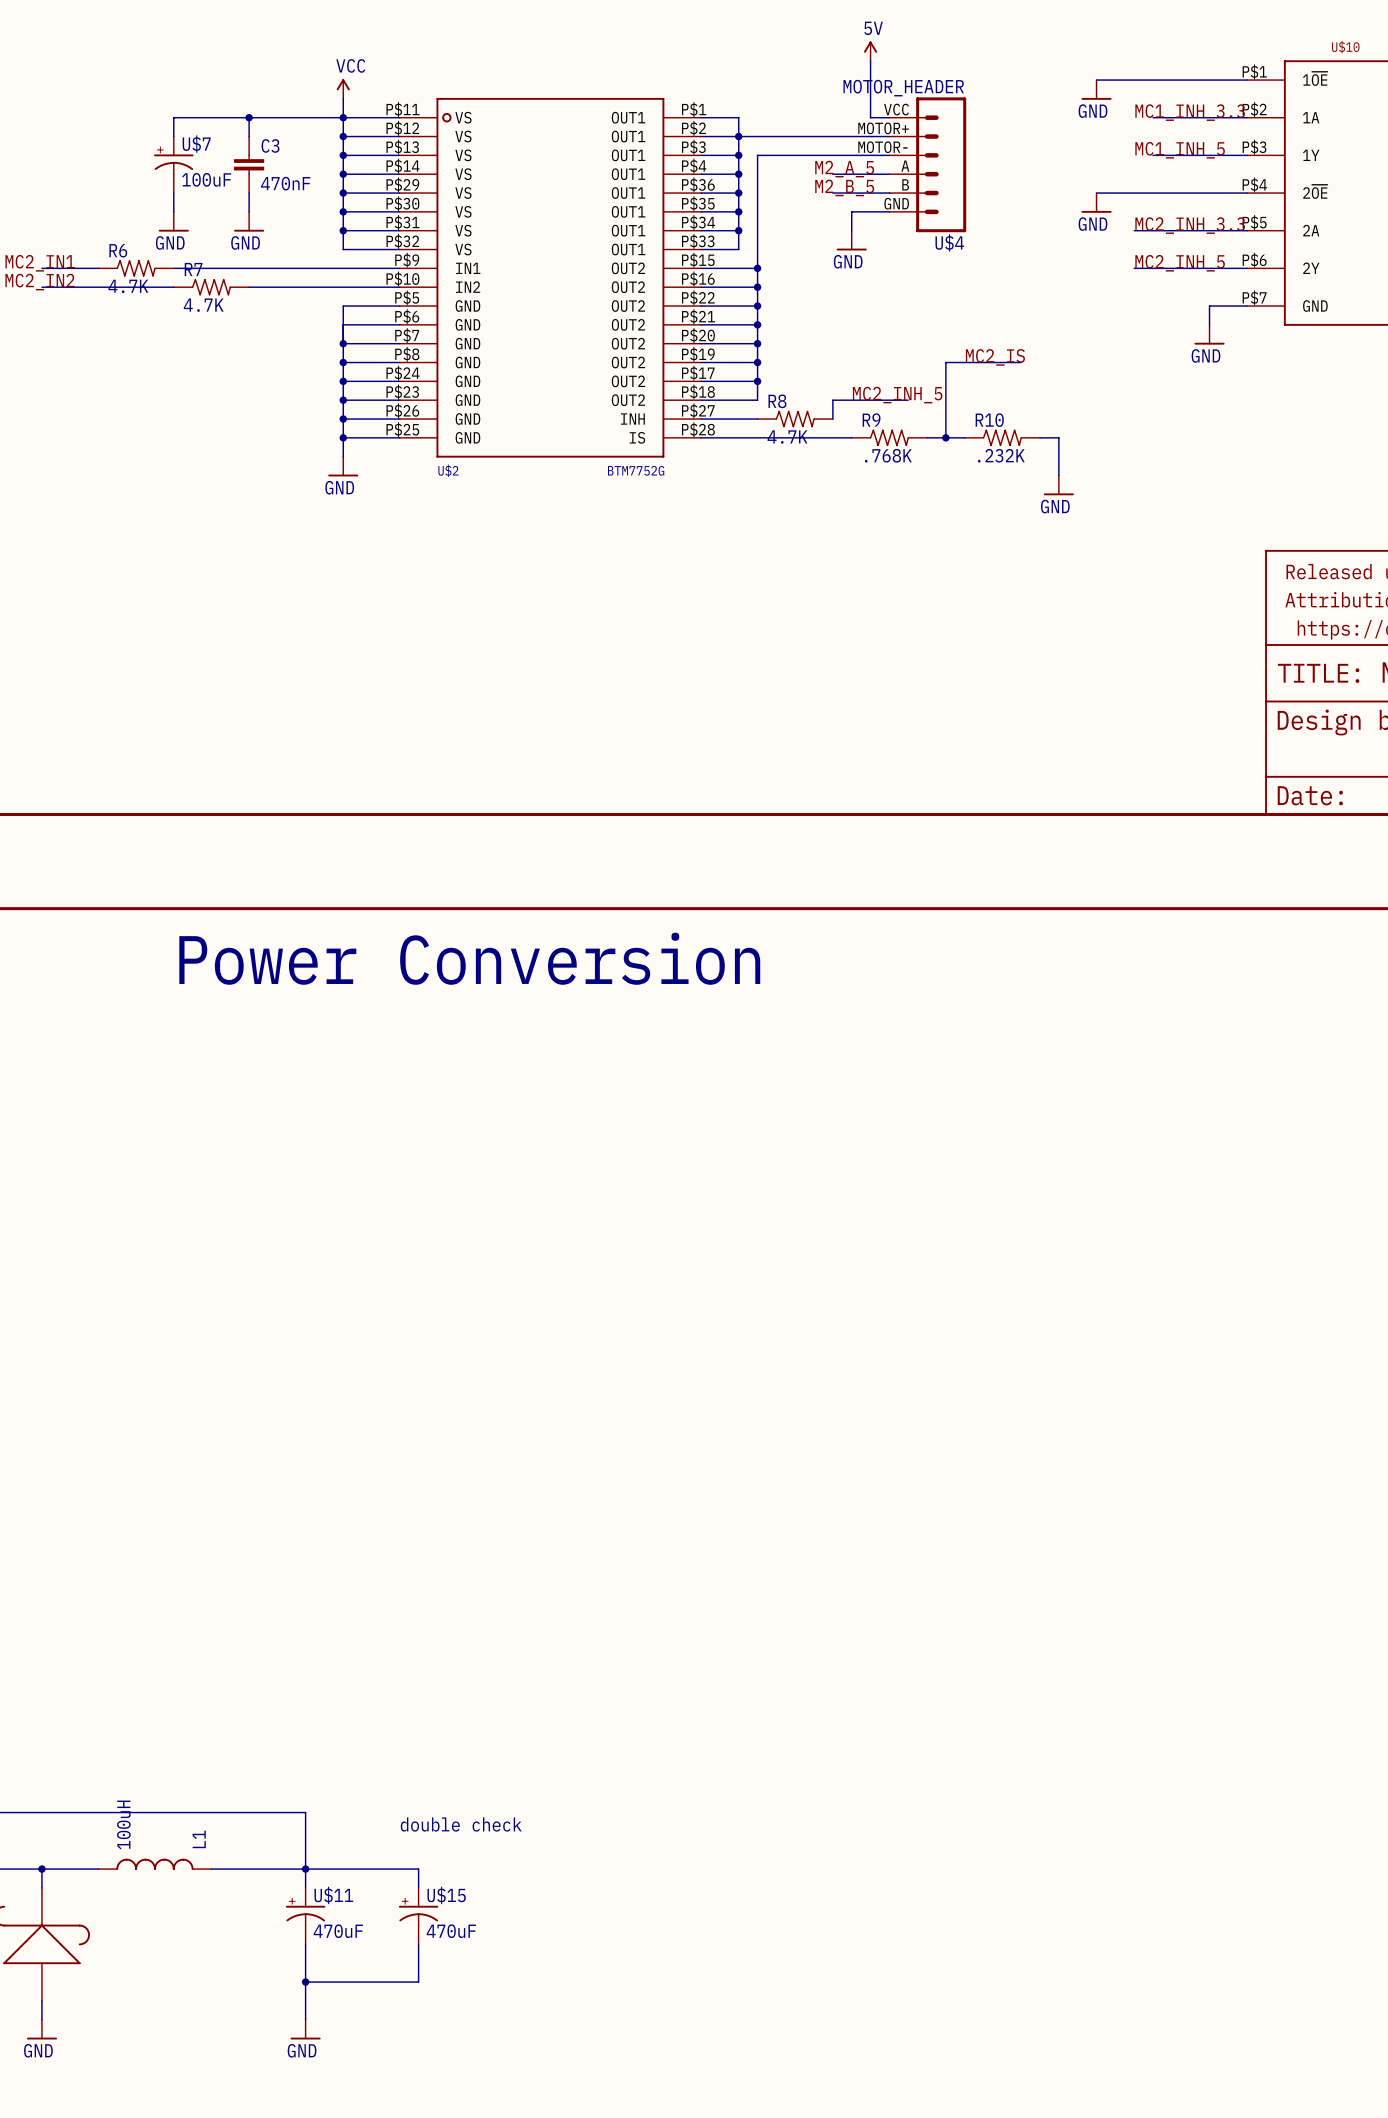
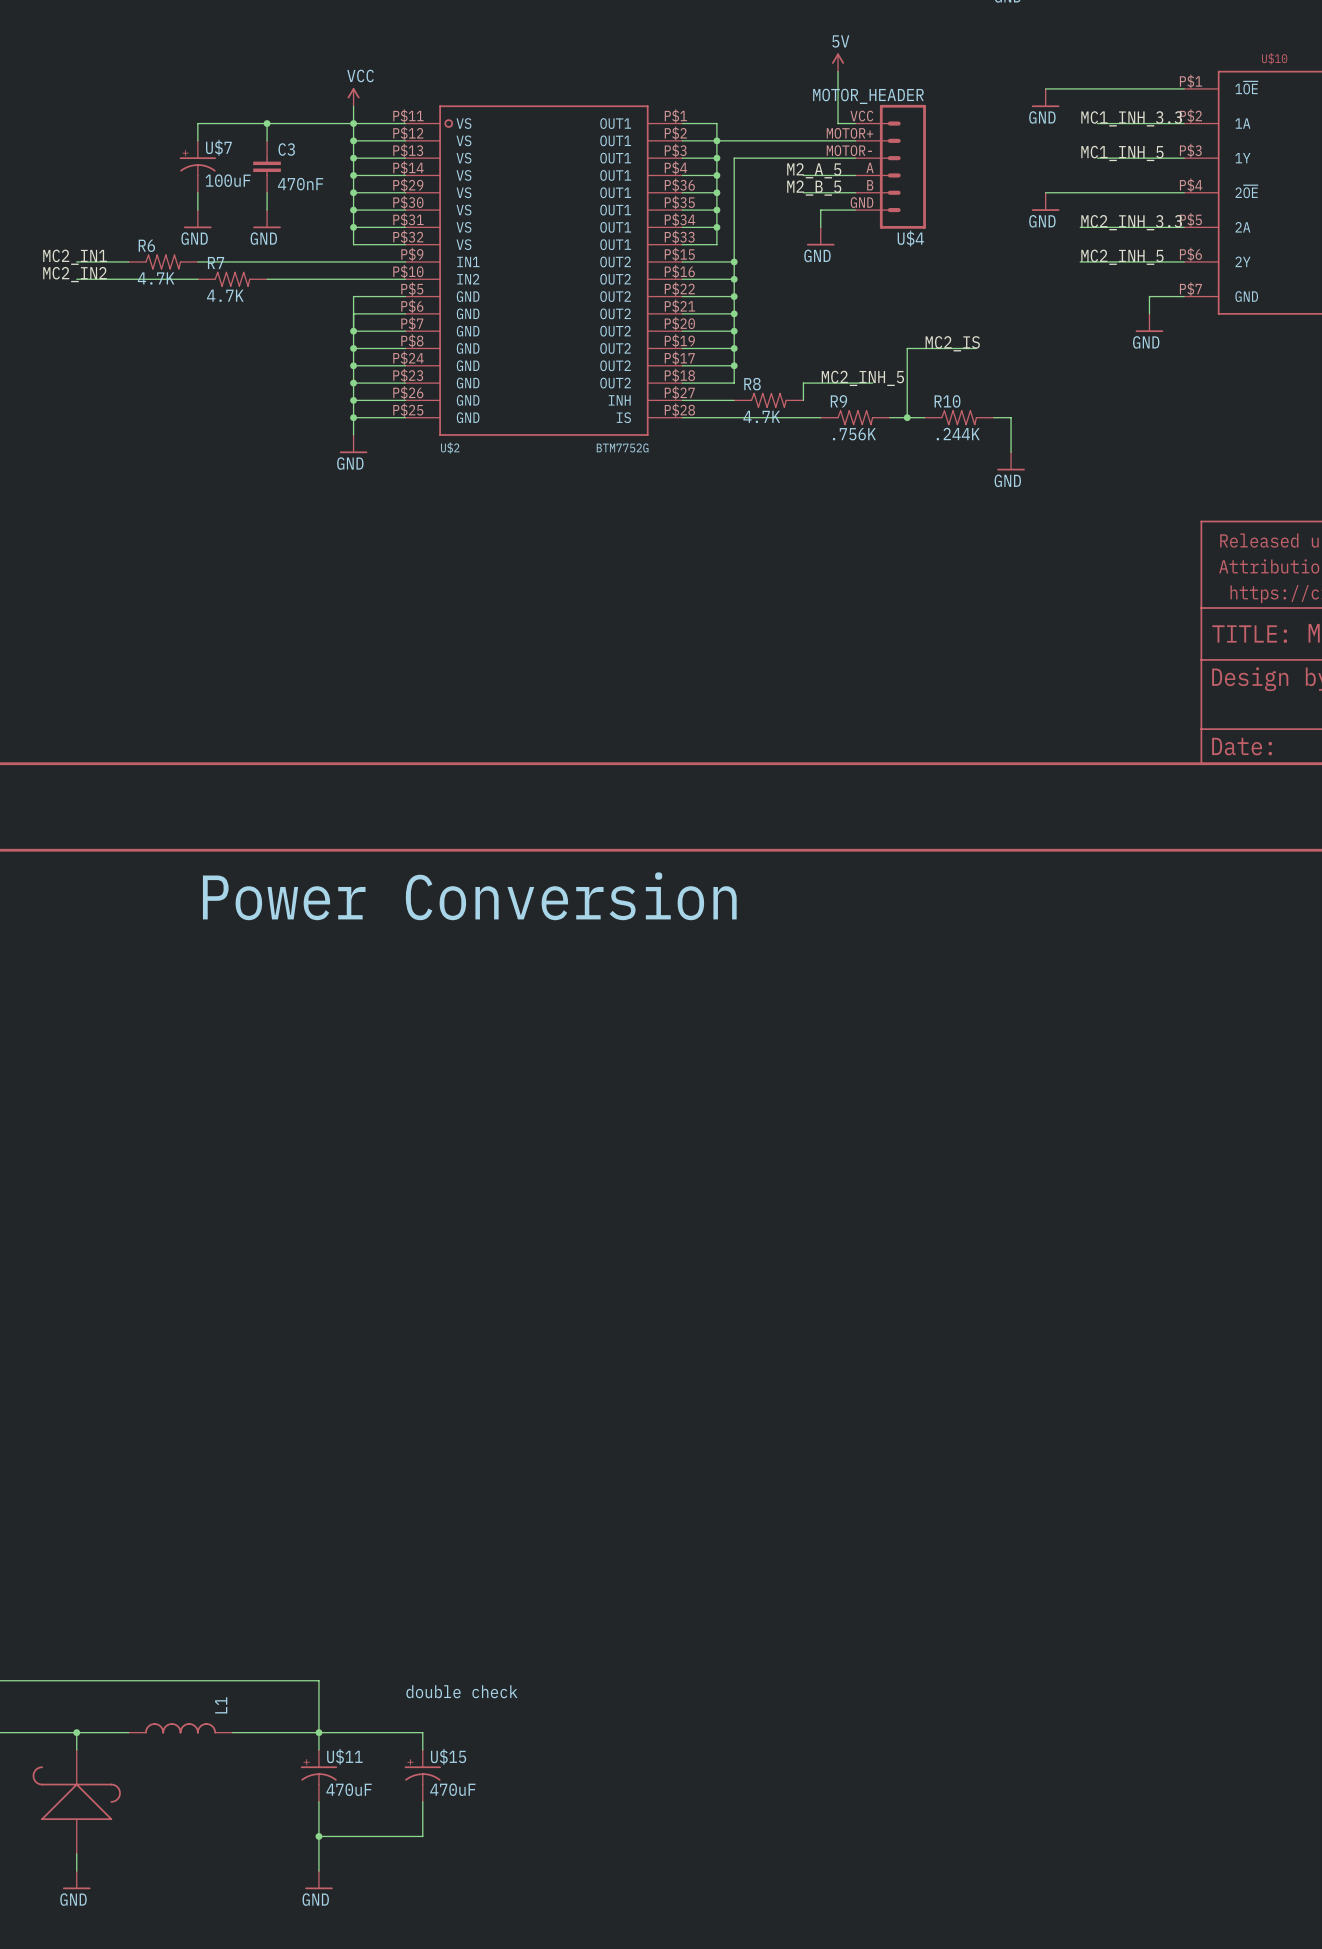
R9 value: .768K (888, 455) -> .756K (854, 434)
R10 value: .232K (1001, 455) -> .244K (958, 434)
L1 value: 100uH (123, 1824) -> none

